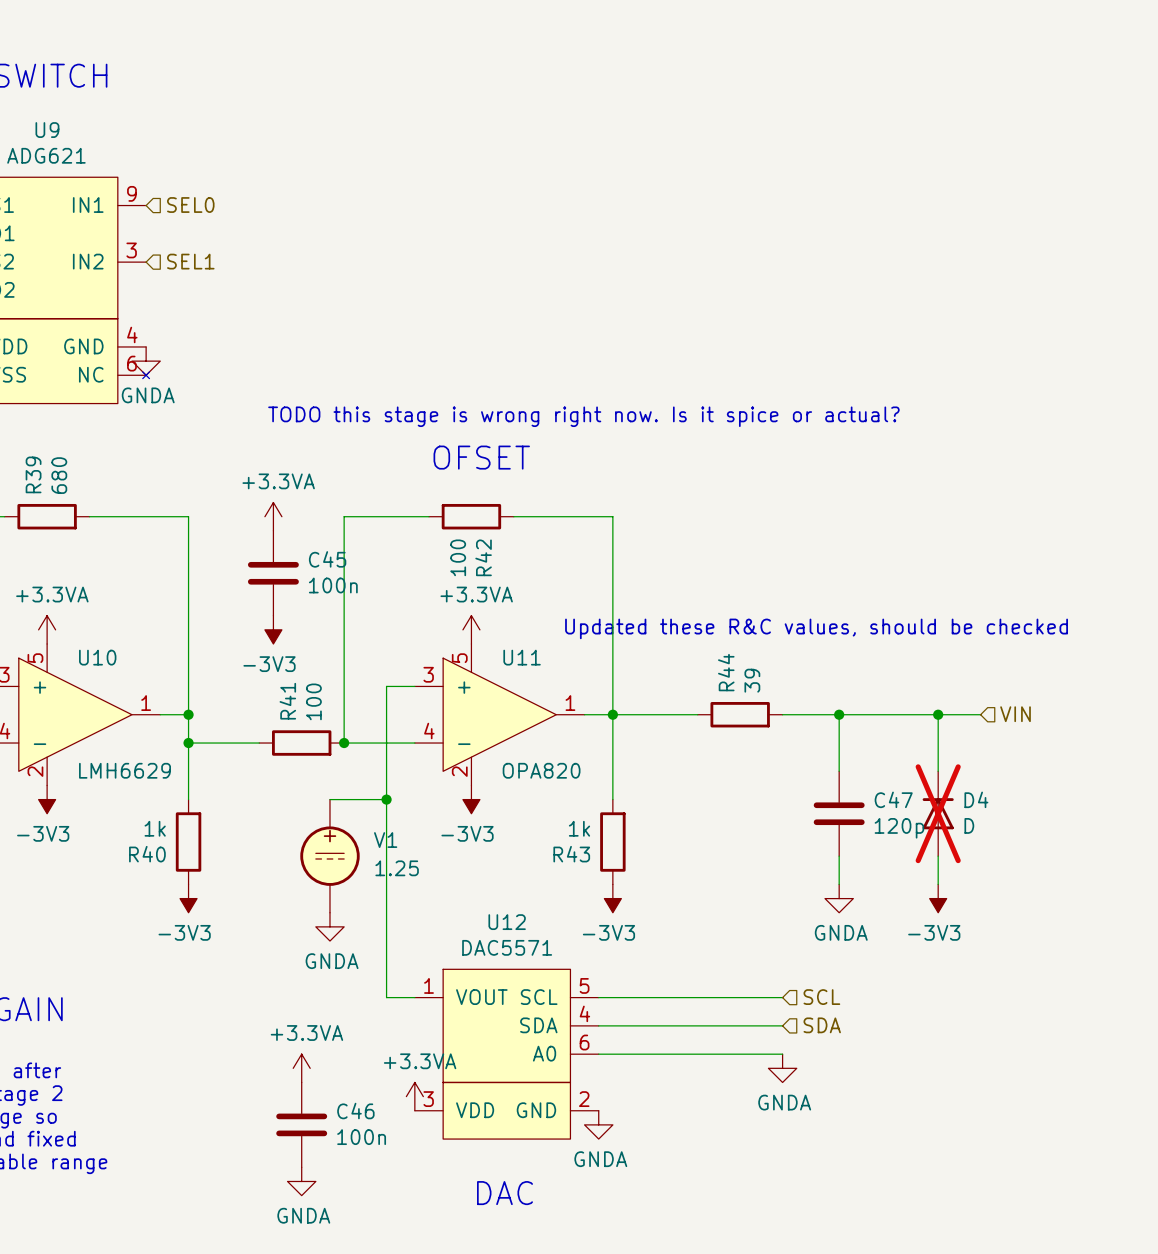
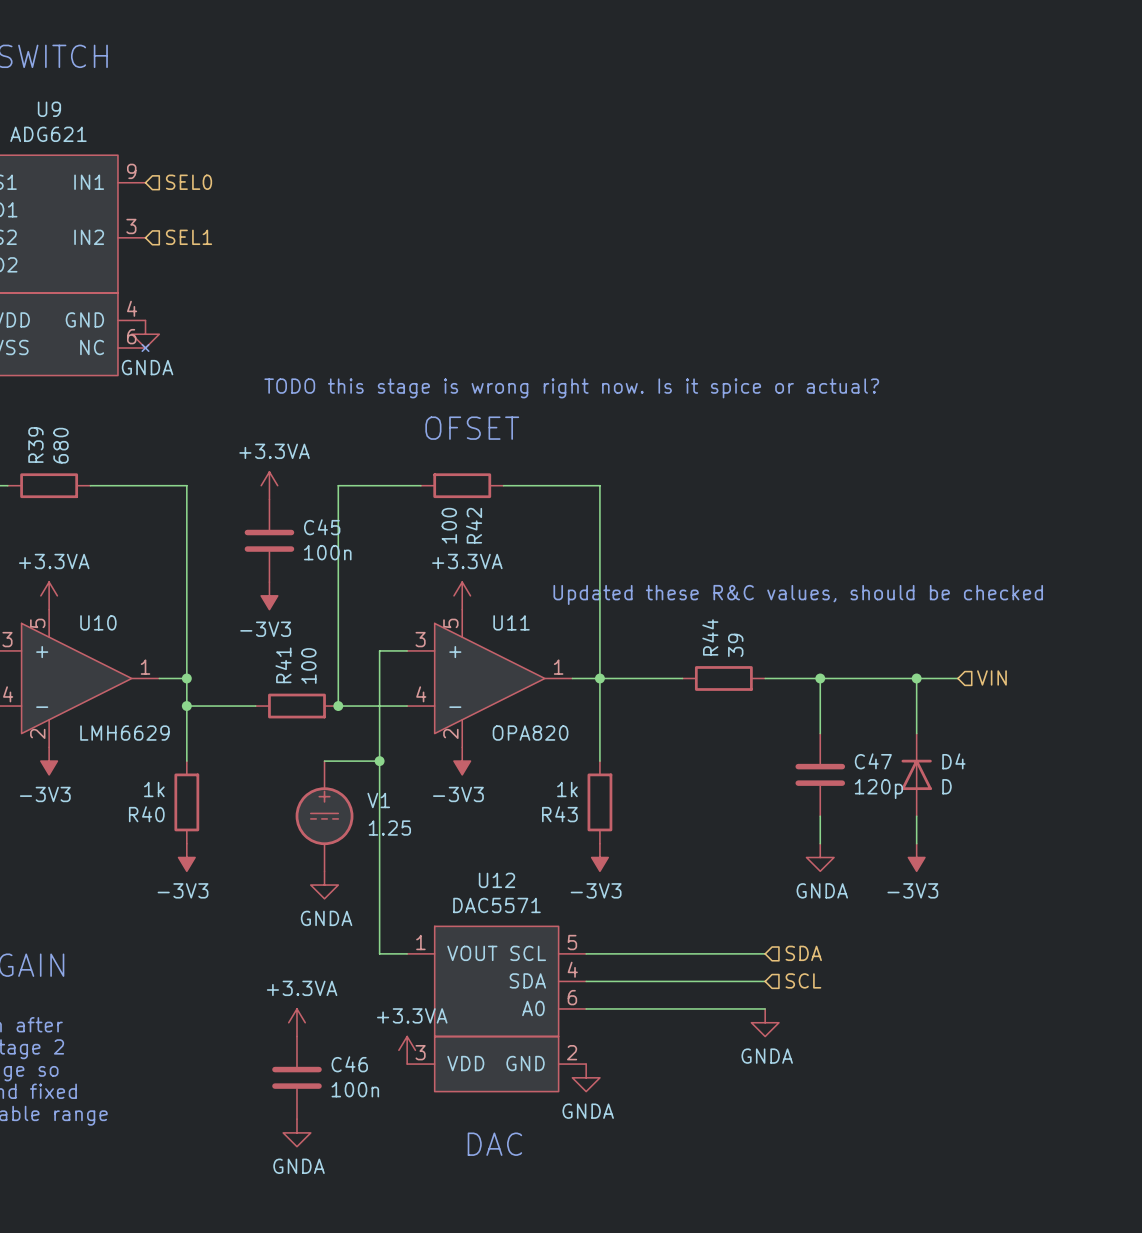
D4 do-not-place cross: (938, 813) -> none
hierarchical label: SCL (821, 997) -> SDA (803, 953)
hierarchical label: SDA (822, 1025) -> SCL (803, 980)

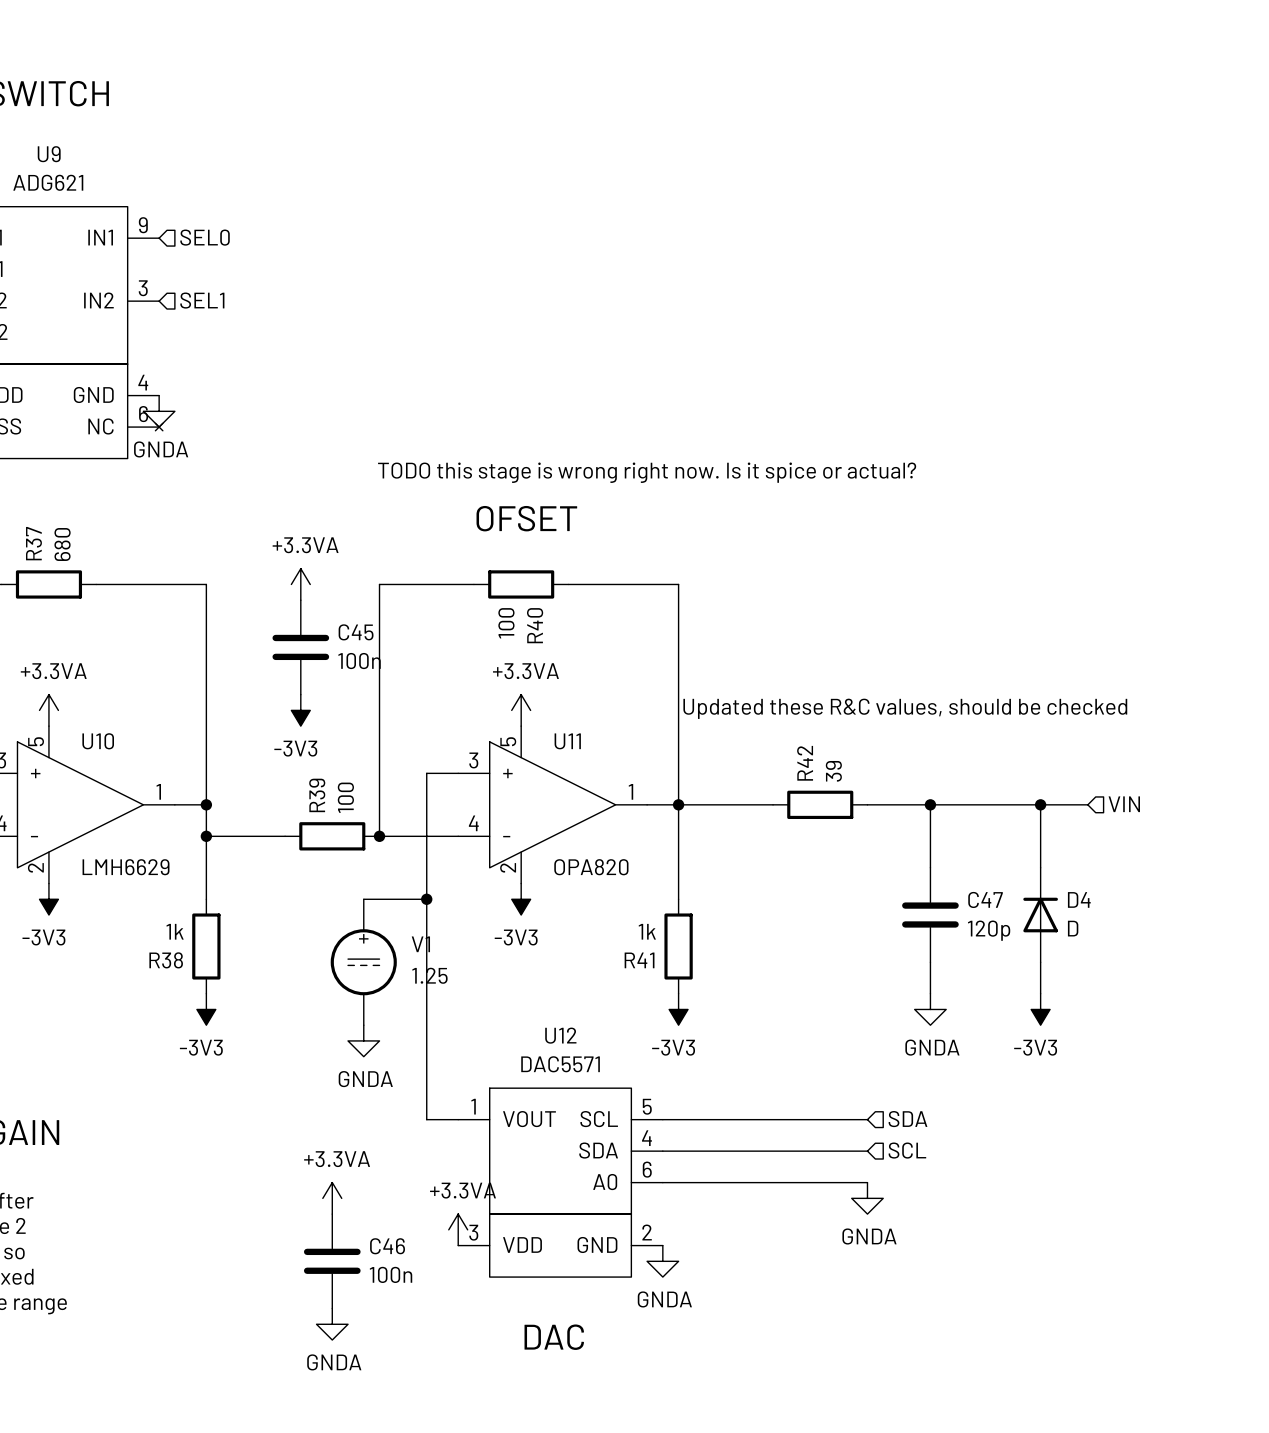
R39 name: R39 (35, 445) -> R37 (33, 543)
R42 name: R42 (474, 525) -> R40 (535, 625)
R44 name: R44 (710, 637) -> R42 (805, 763)
R41 name: R41 (283, 665) -> R39 (317, 795)
R40 name: R40 (146, 814) -> R38 (166, 960)
R43 name: R43 (559, 814) -> R41 (639, 960)

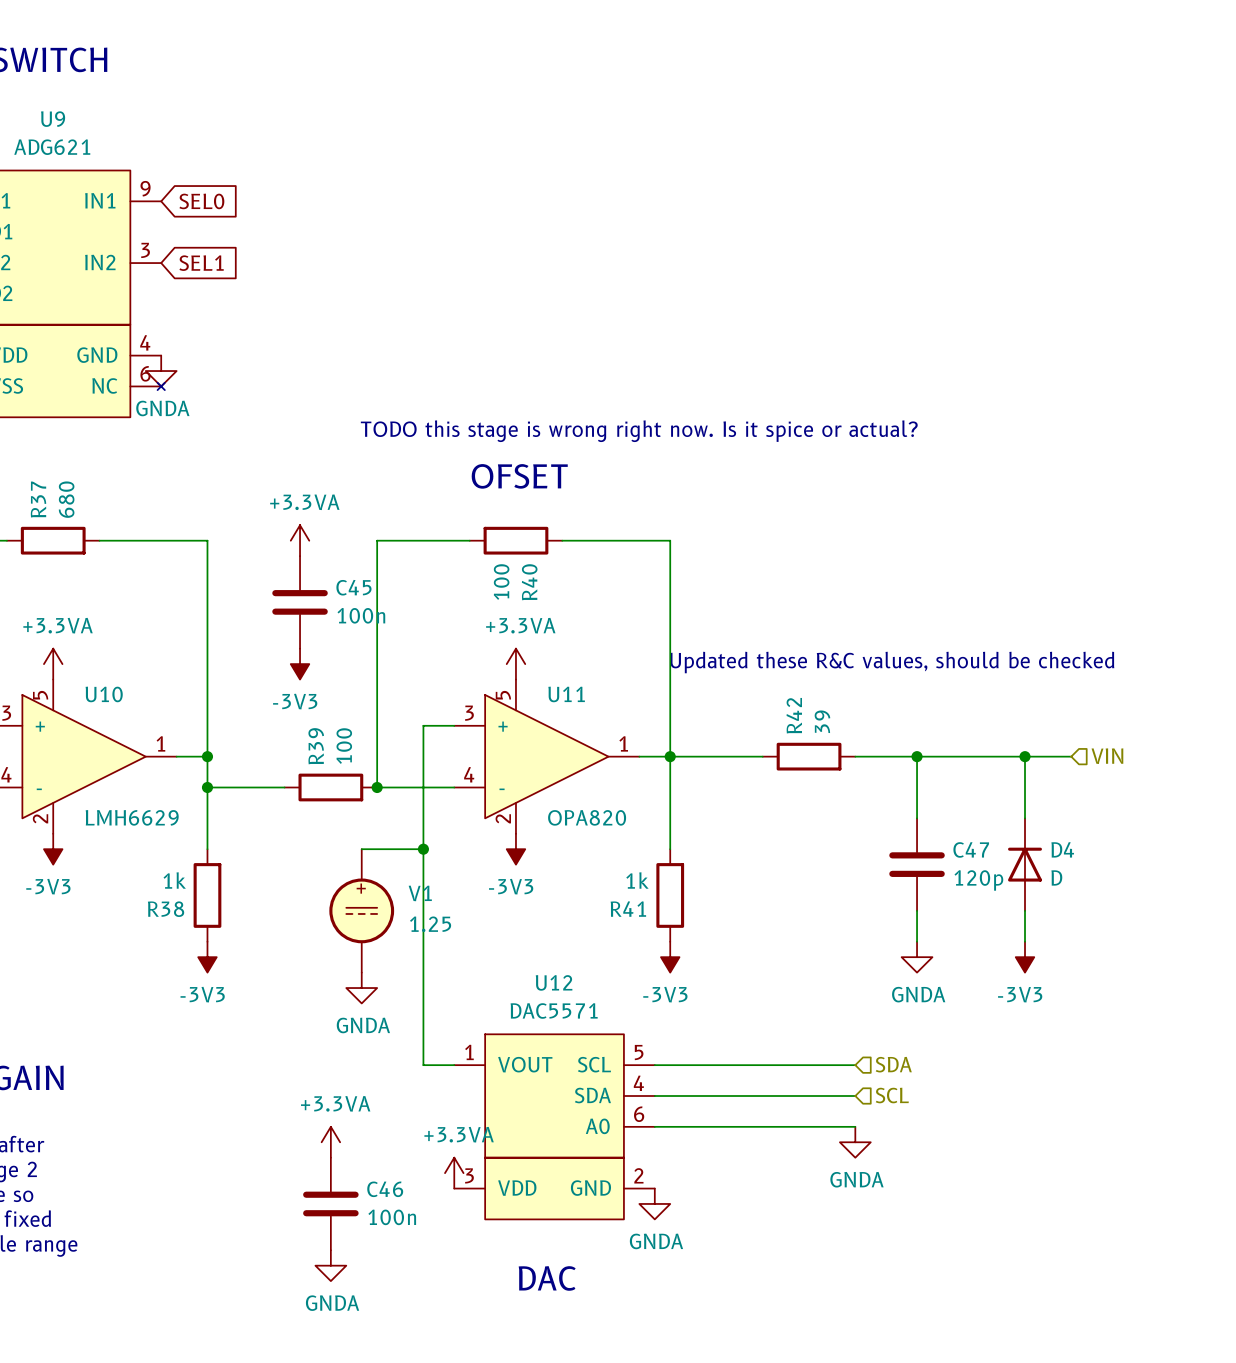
hierarchical label: SEL0 (205, 237) -> none
global label: none -> SEL0 (201, 201)
hierarchical label: SEL1 (202, 300) -> none
global label: none -> SEL1 (201, 263)

